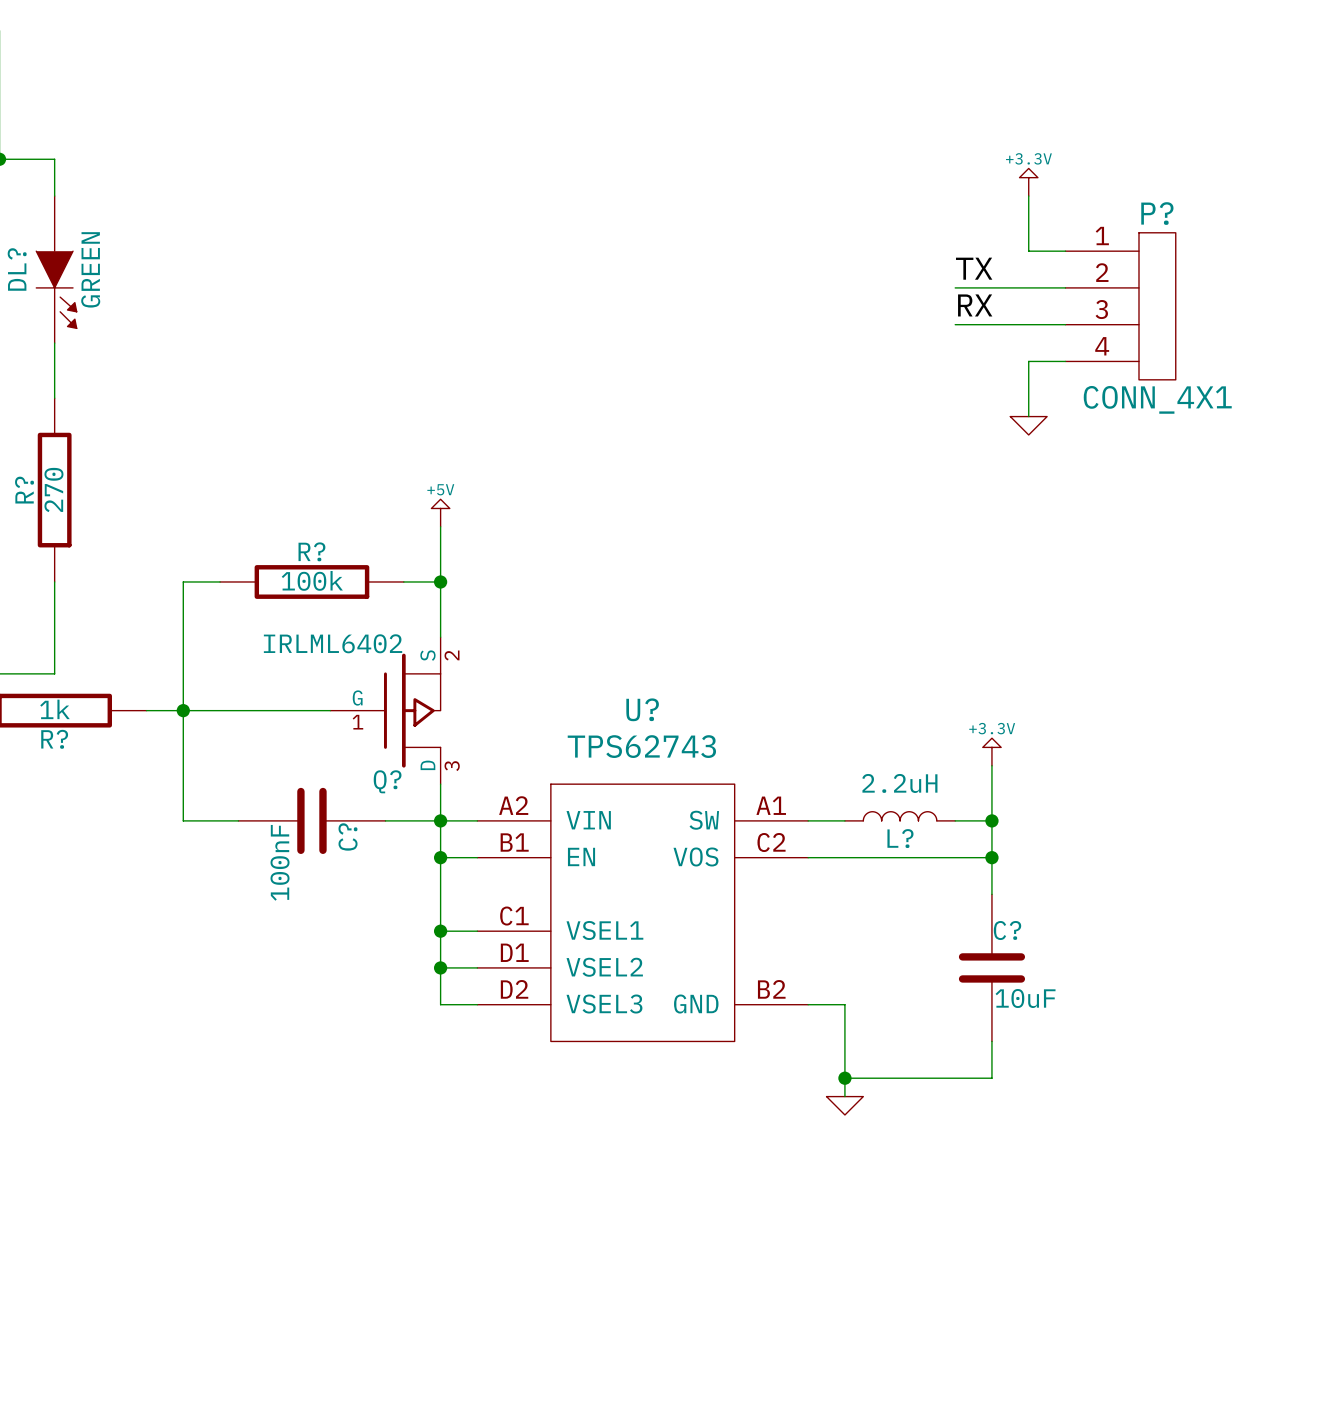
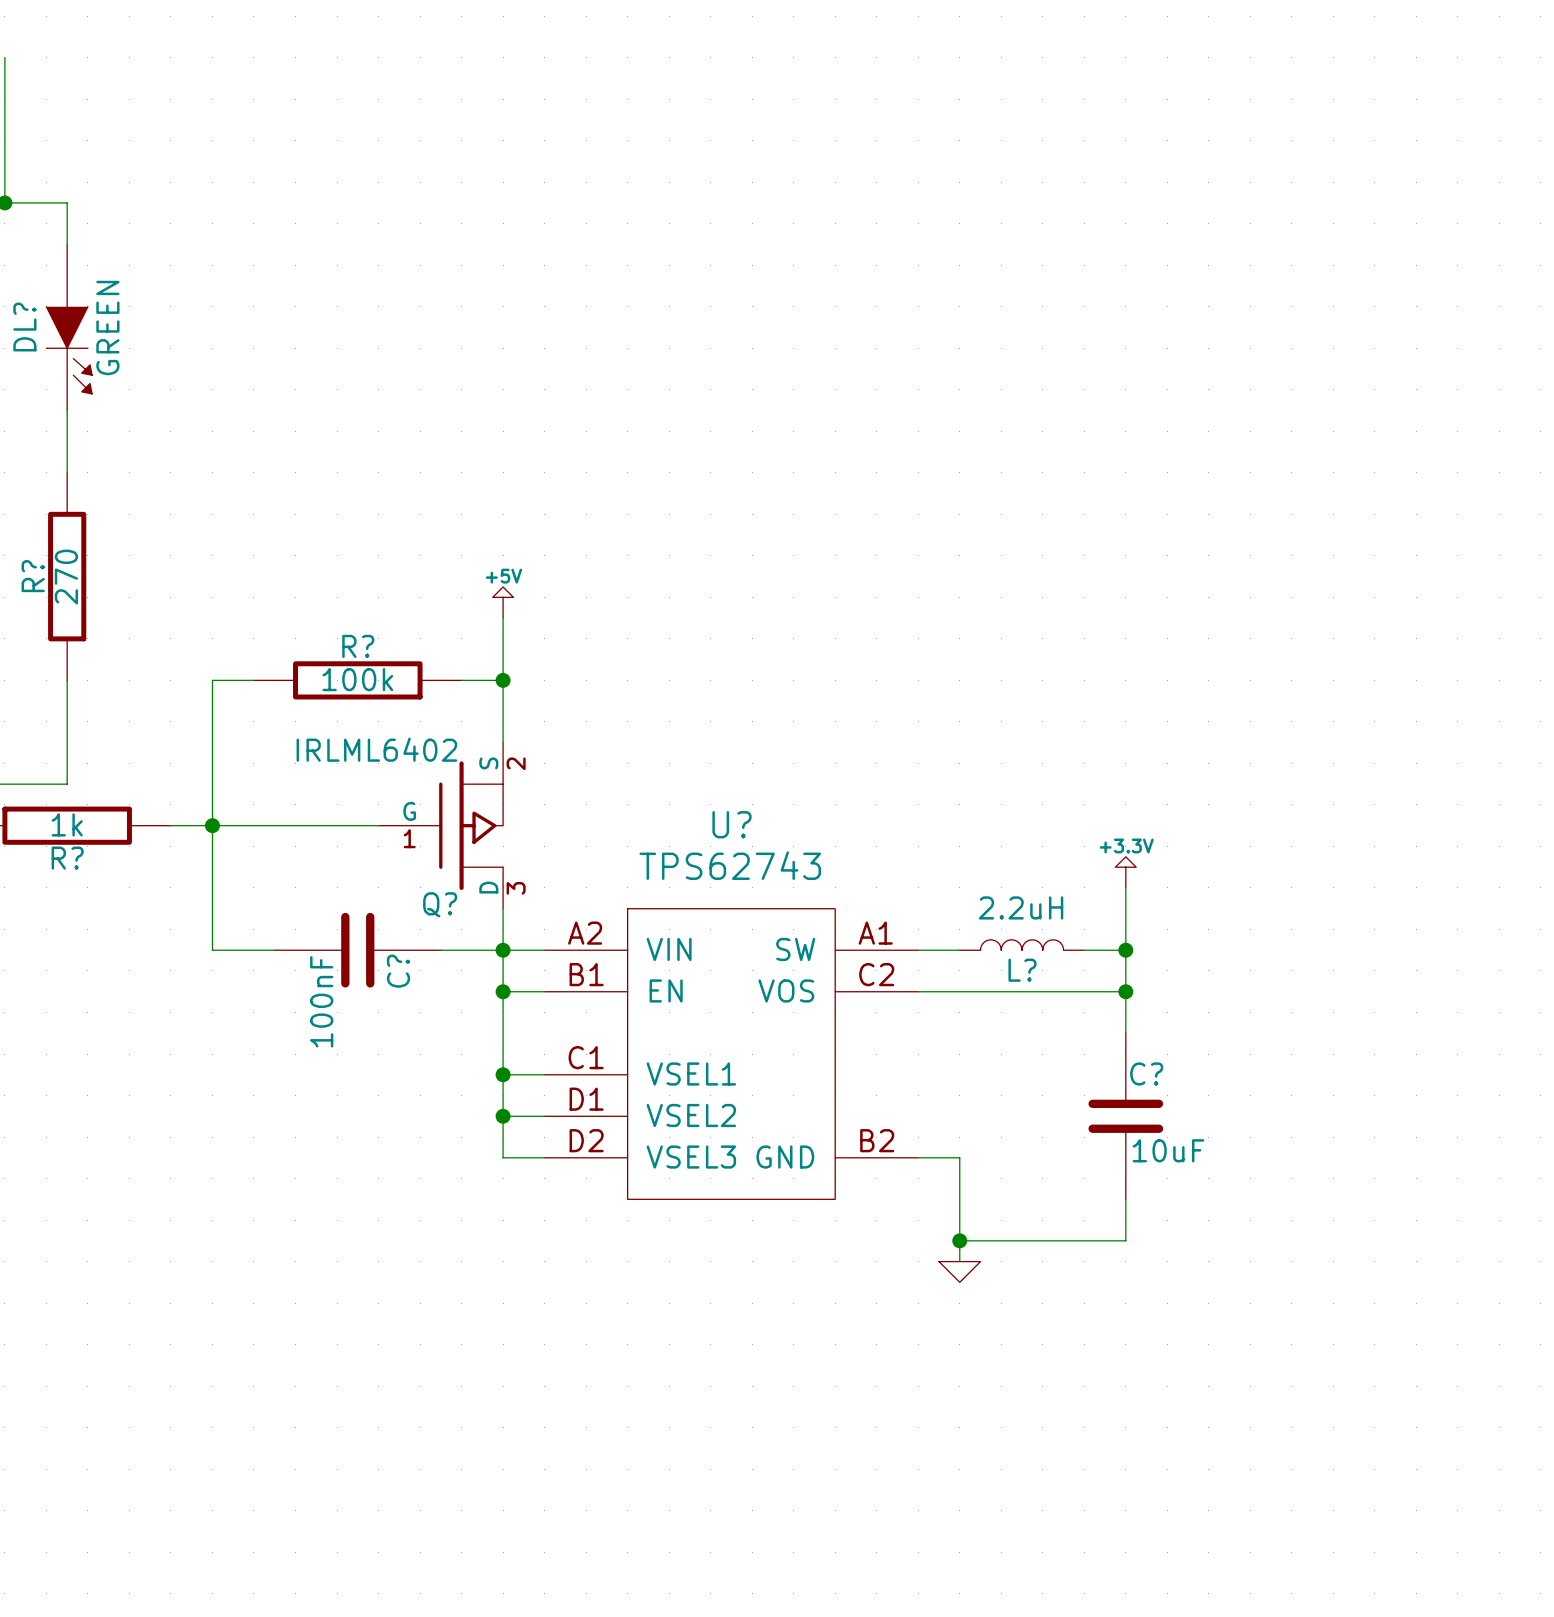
power symbol: +3.3V (1028, 182) -> none
wire: (1028, 196) (1028, 251) (1065, 251) -> none
label: TX (974, 268) -> none
wire: (955, 287) (1065, 287) -> none
label: RX (975, 305) -> none
P?: CONN_4X1 (1120, 306) -> none
wire: (955, 324) (1065, 324) -> none
wire: (1065, 361) (1028, 361) (1028, 416) -> none
power symbol: (1028, 425) -> none

